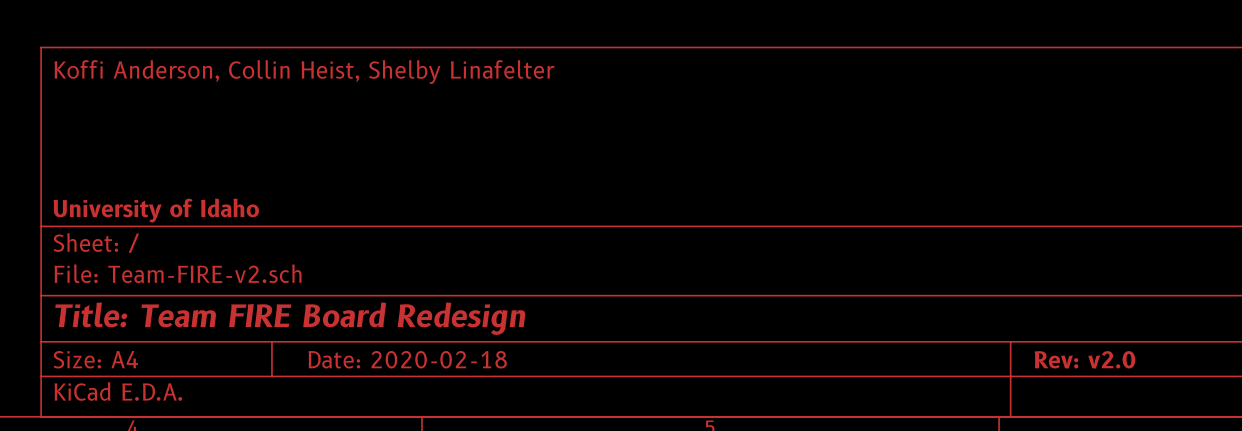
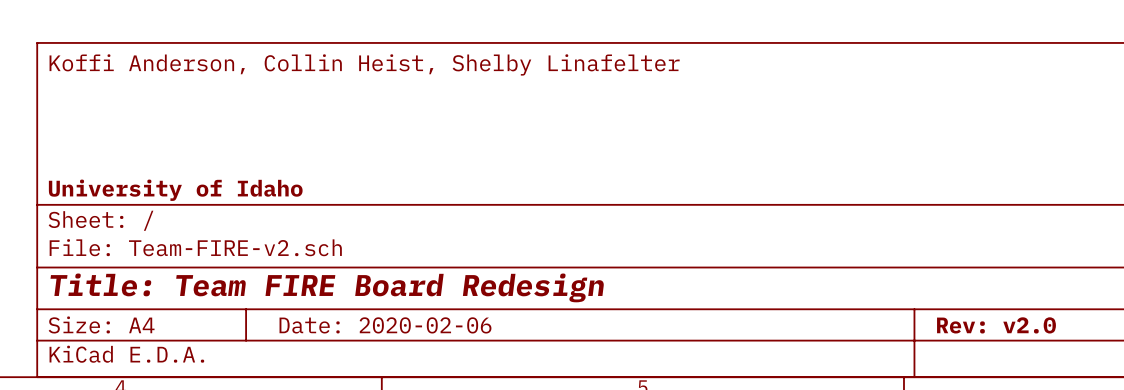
title block: Date: 2020-02-18 (407, 359) -> Date: 2020-02-06 (385, 325)

